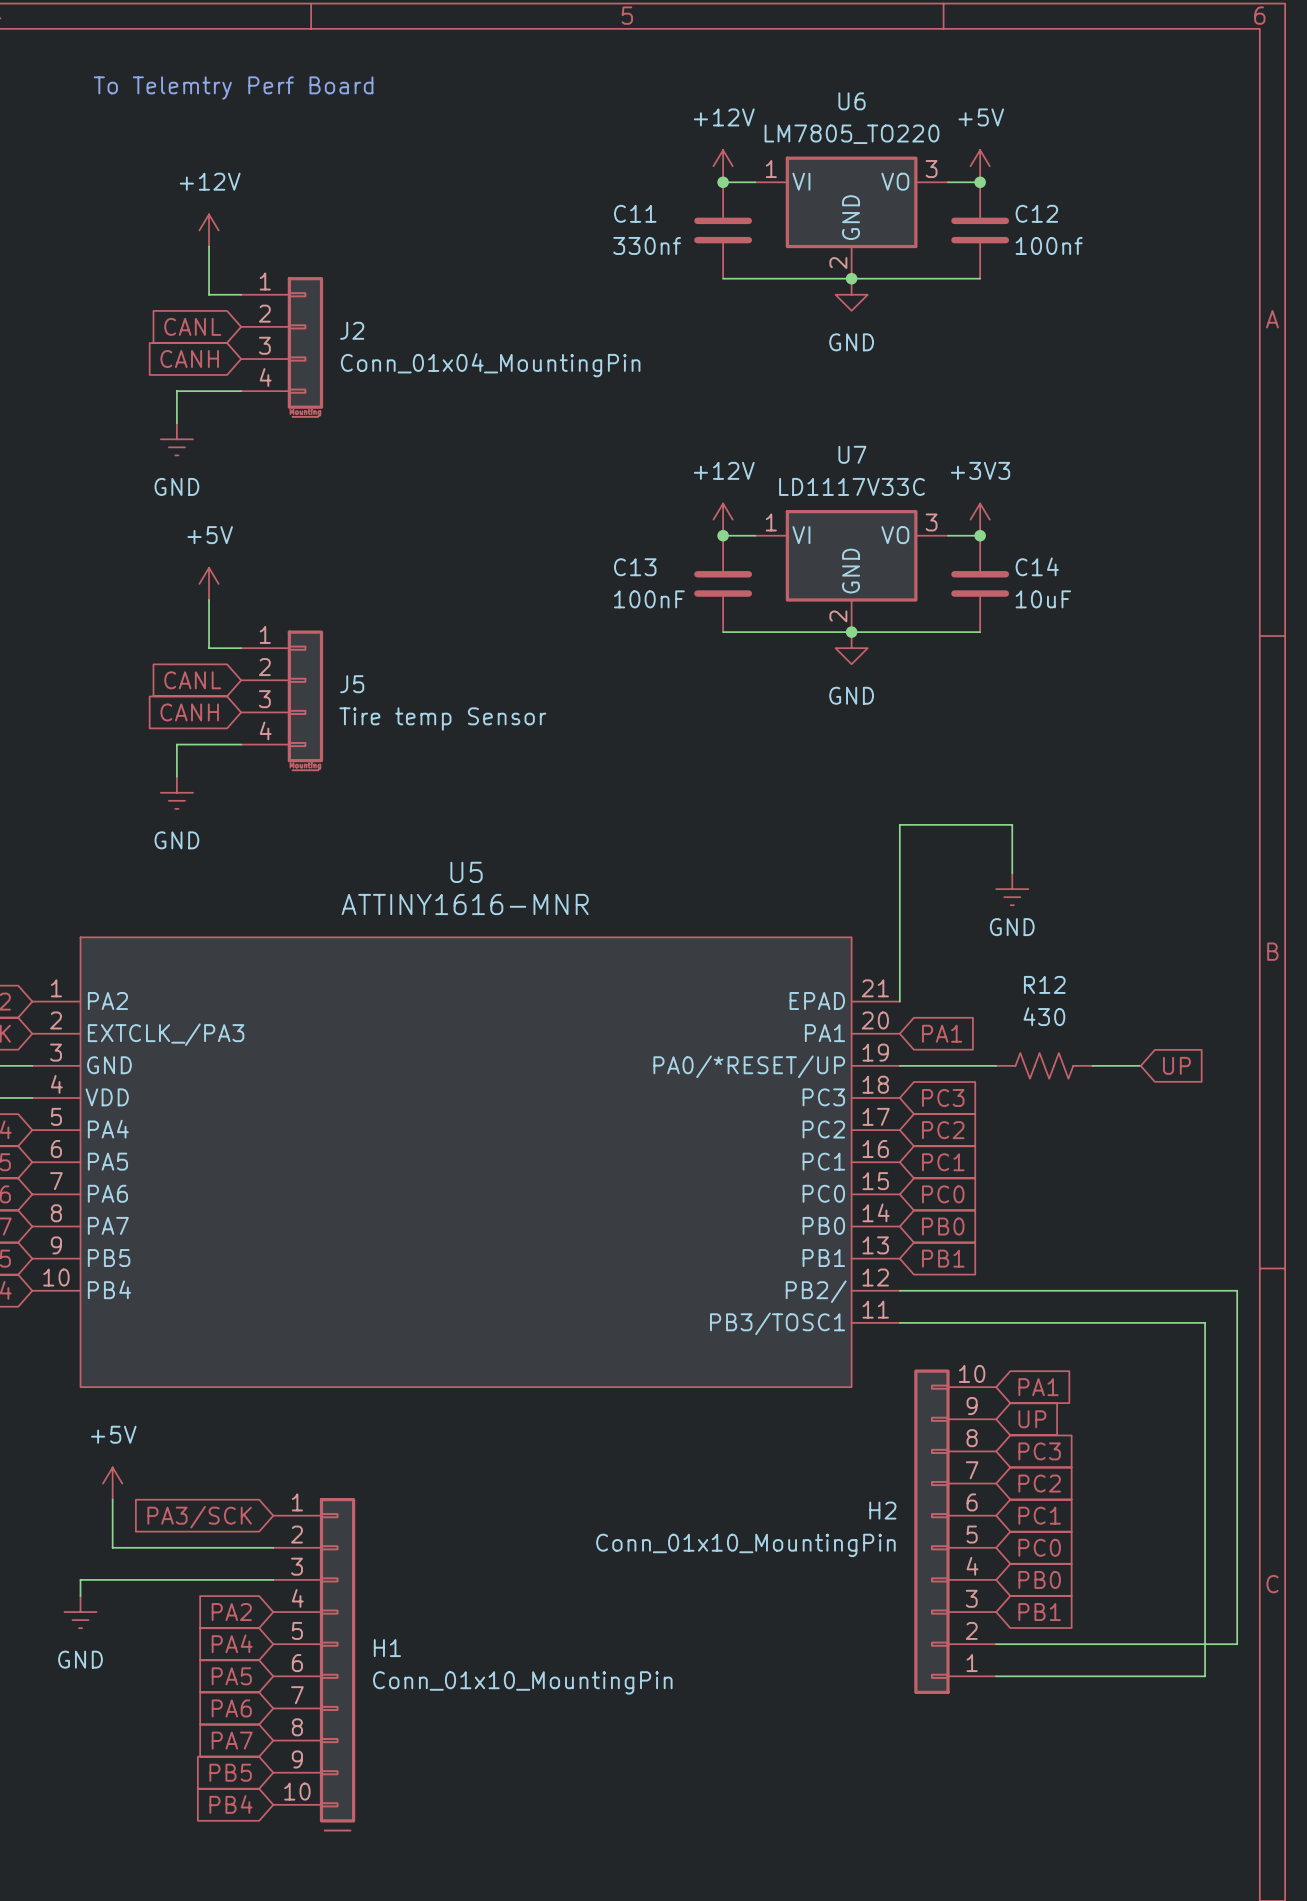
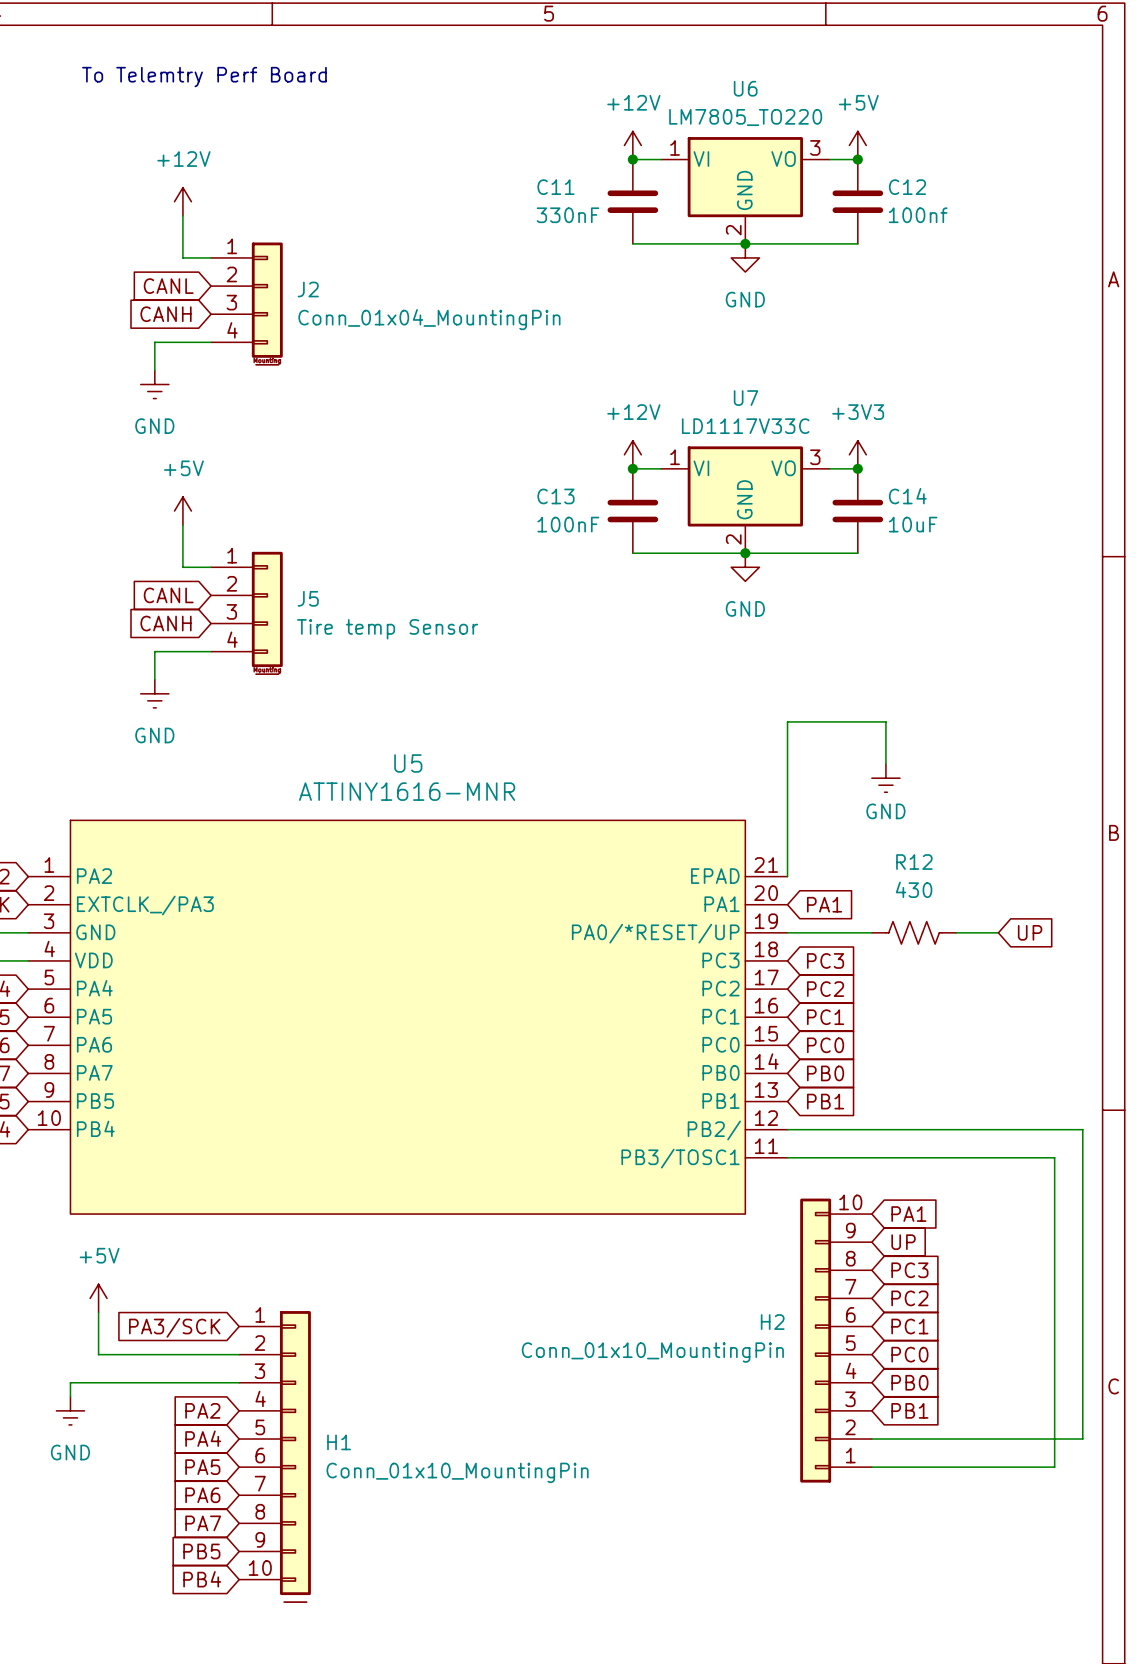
C11 value: 330nf (647, 245) -> 330nF (568, 215)

